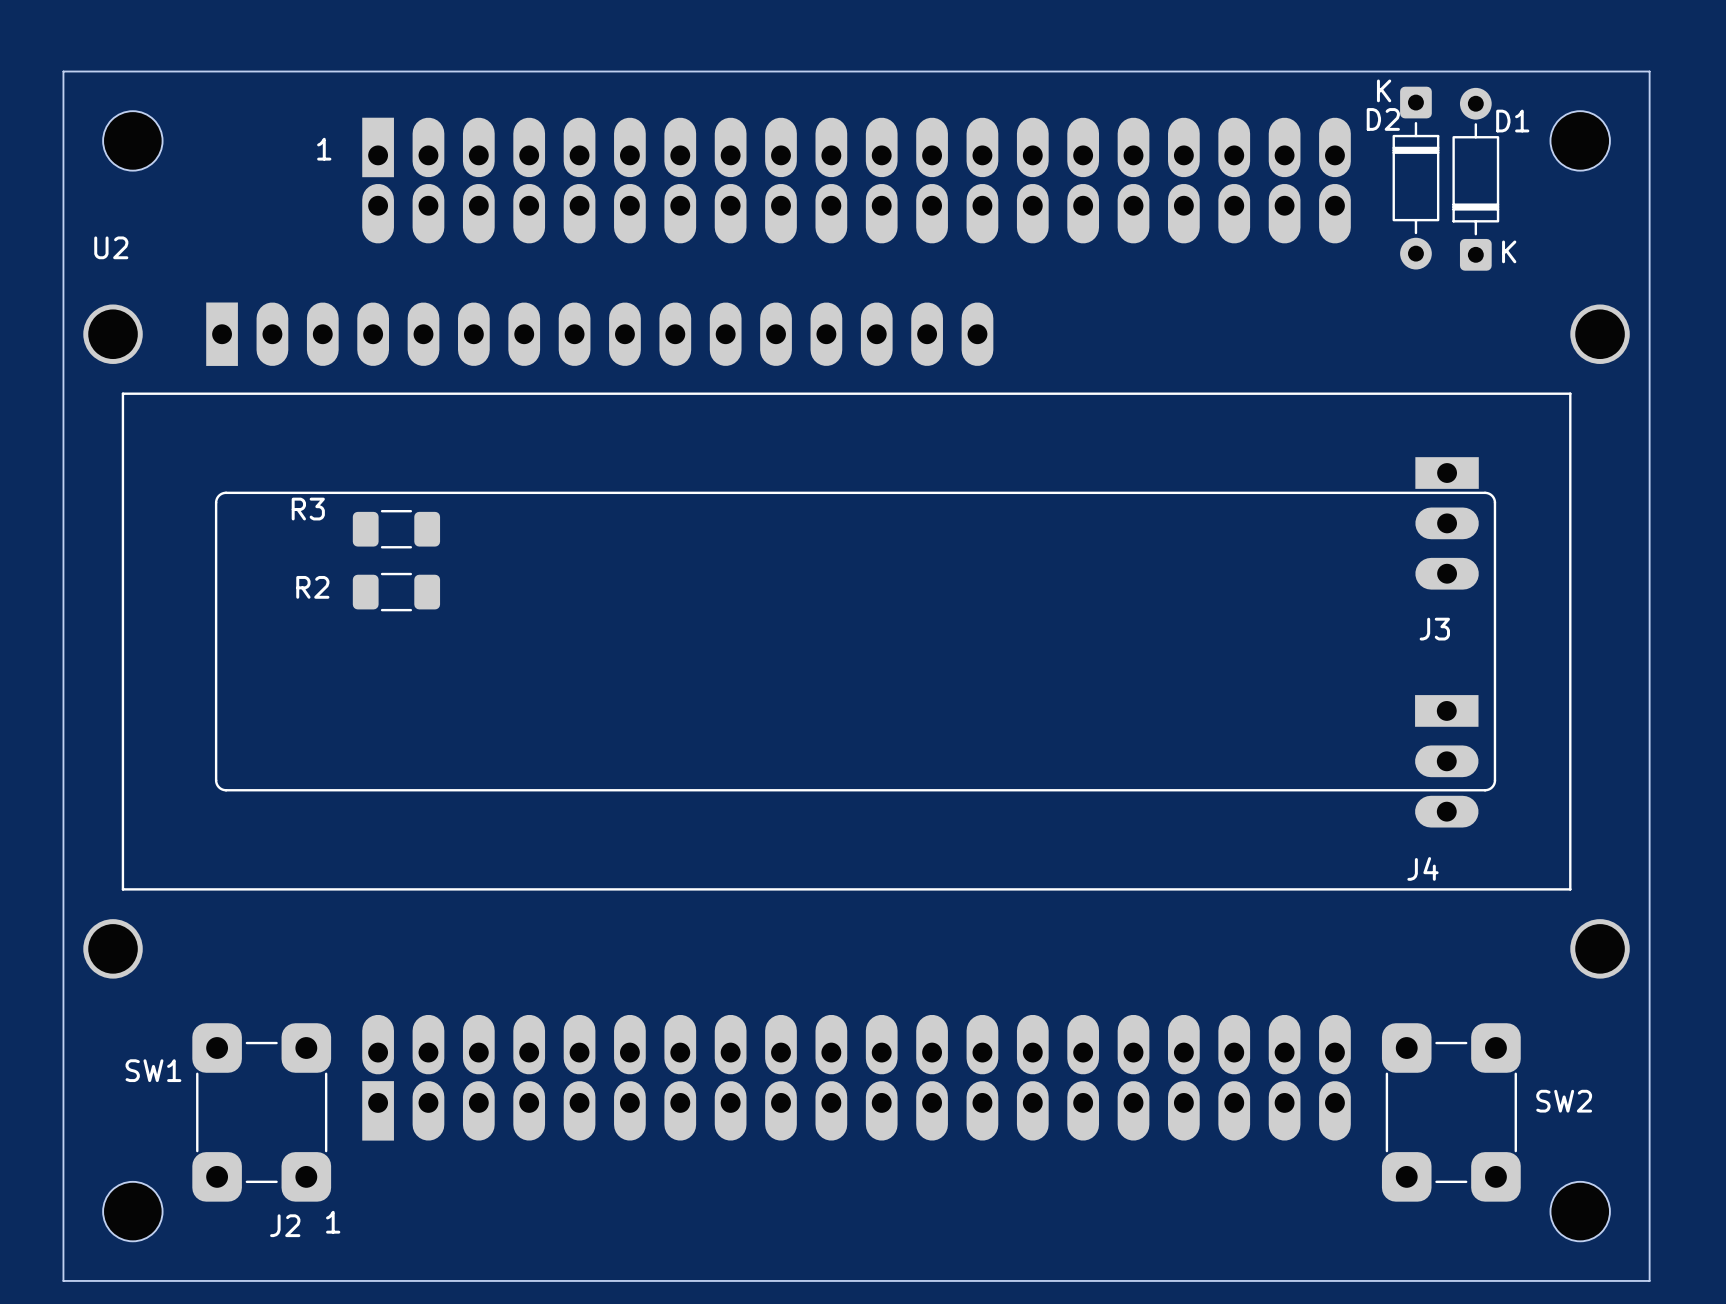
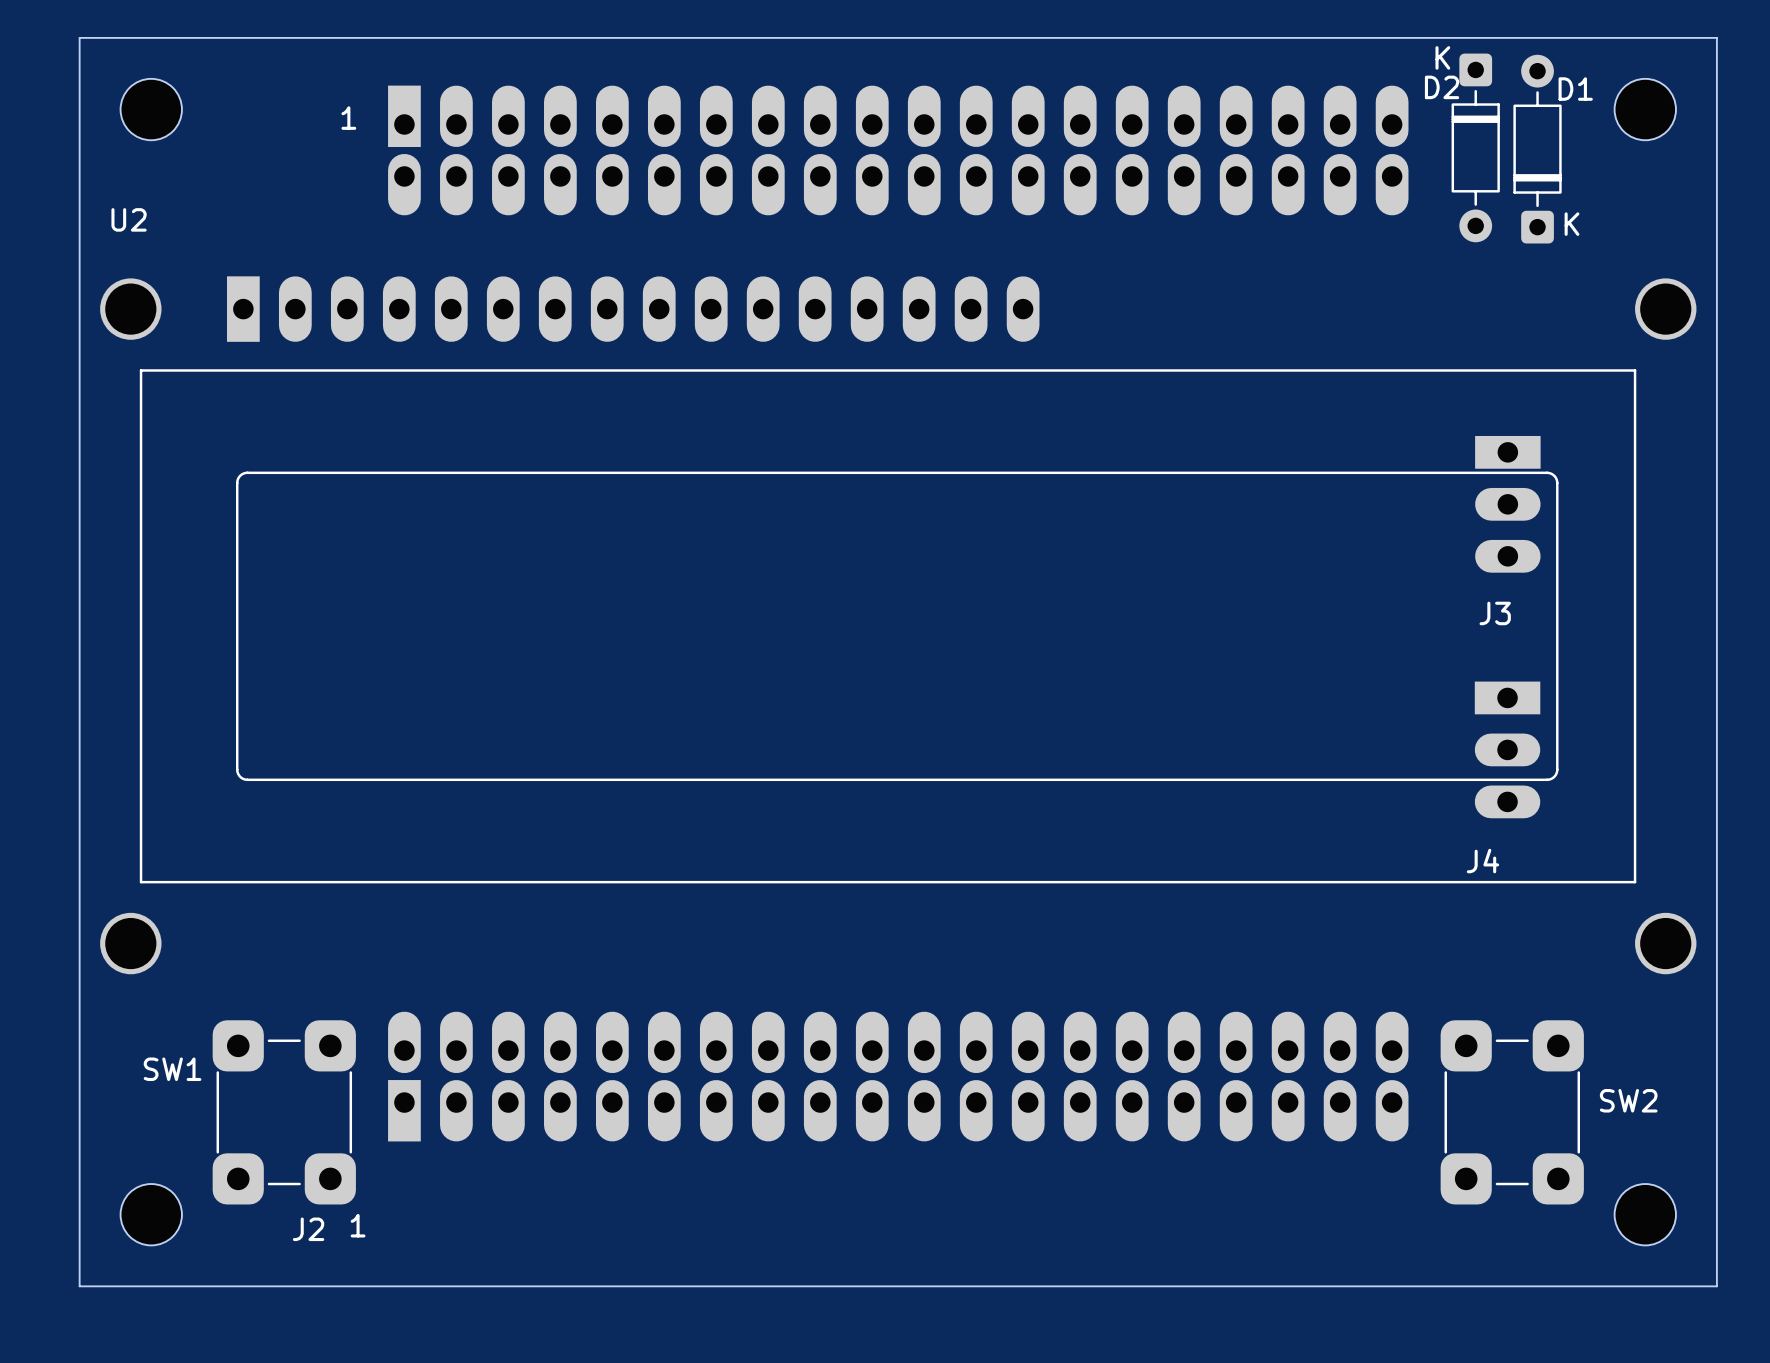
R3: (396, 529) -> none
R2: (396, 592) -> none

